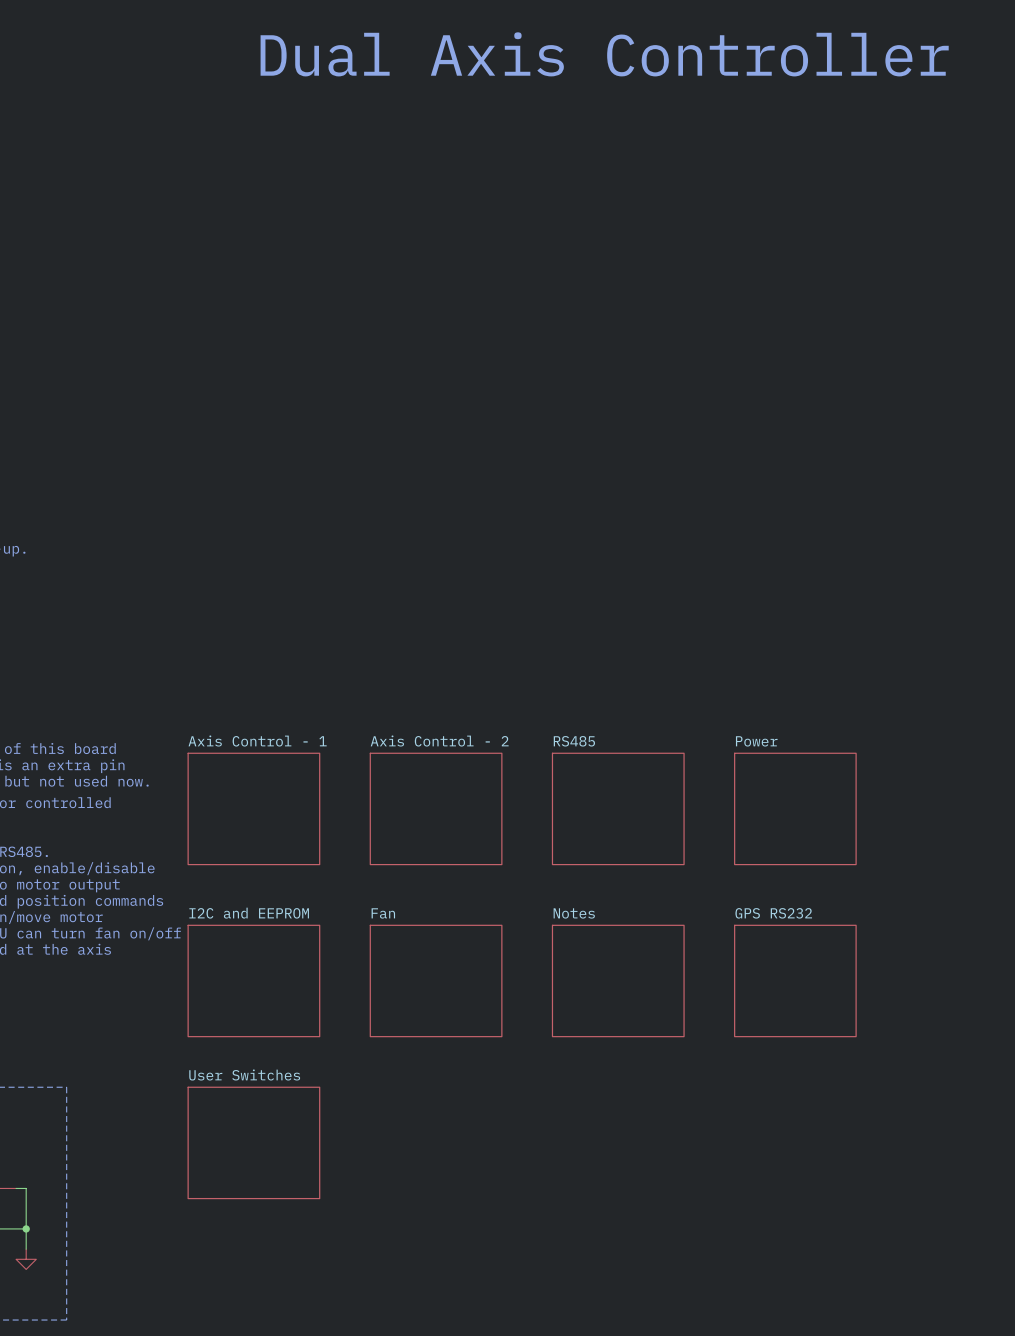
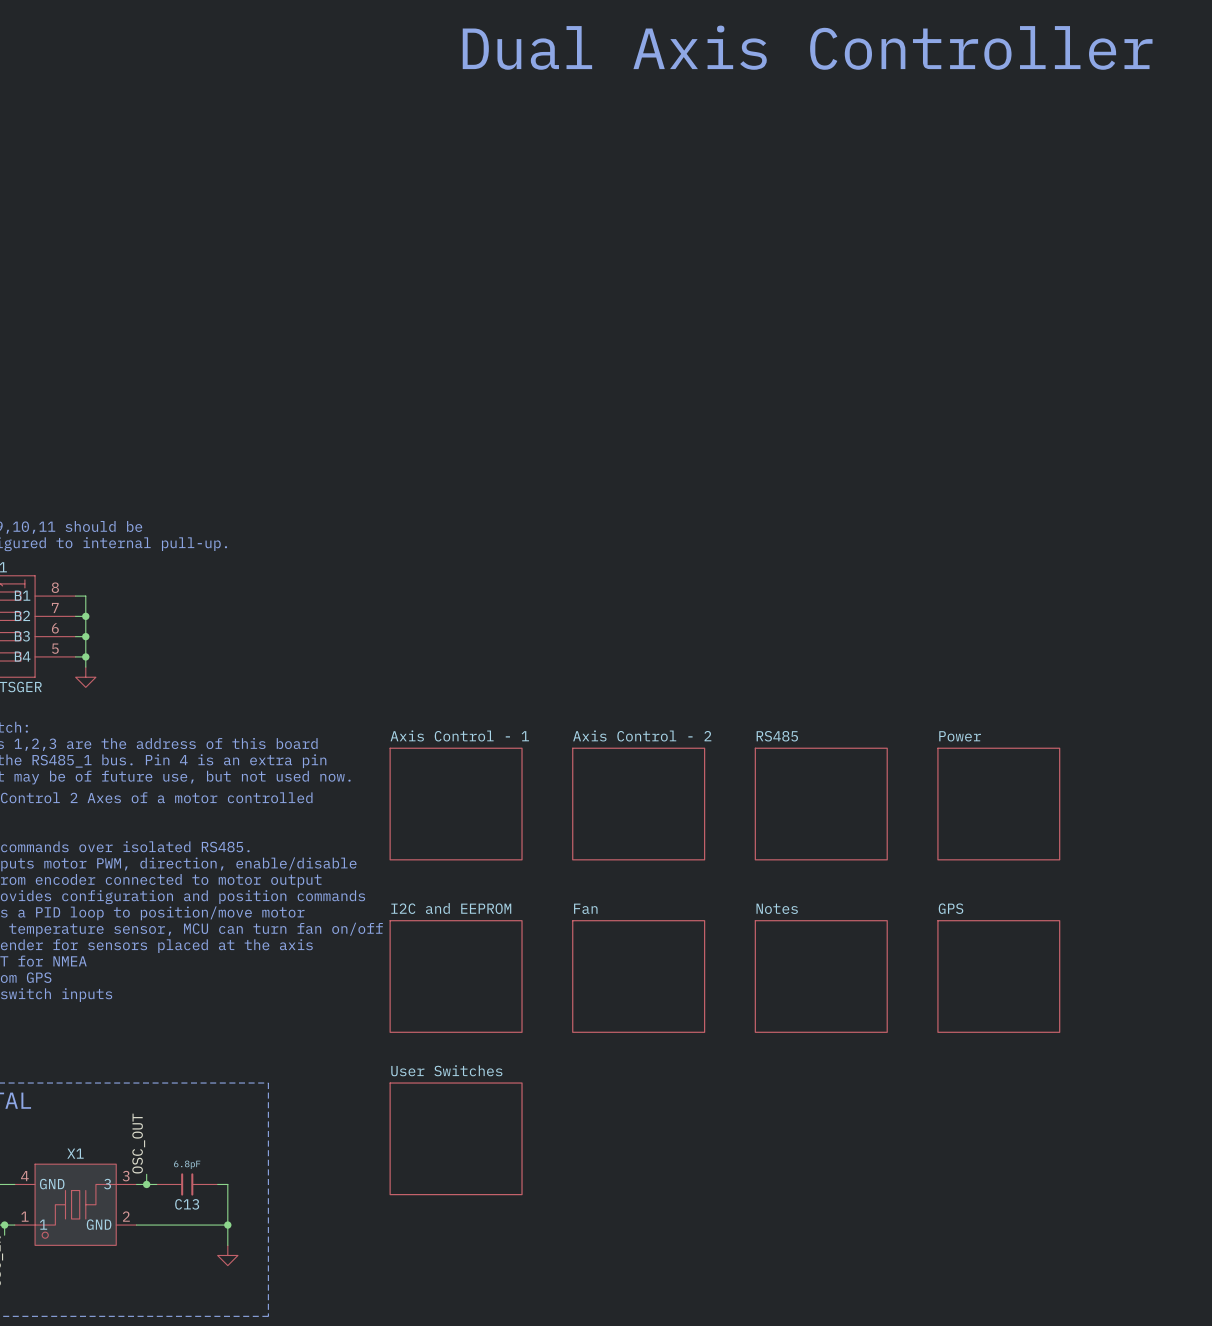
sheet GPS RS232 name: GPS RS232 (773, 913) -> GPS (951, 908)

